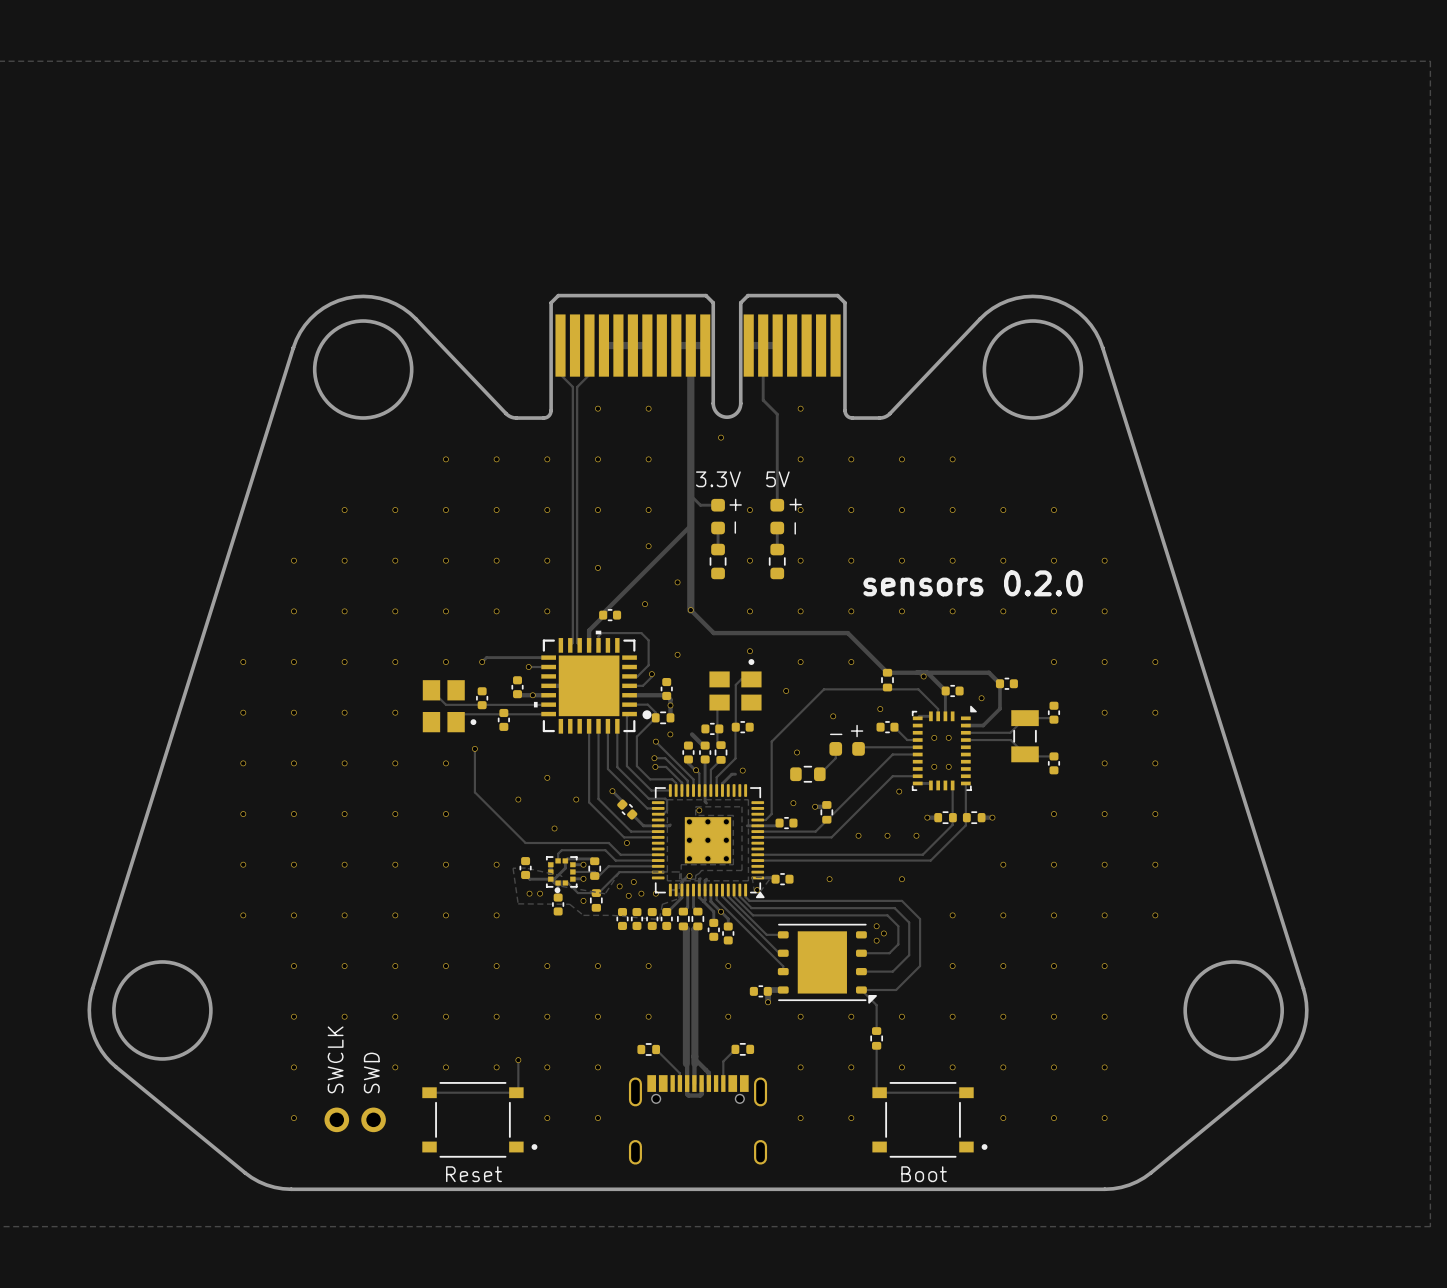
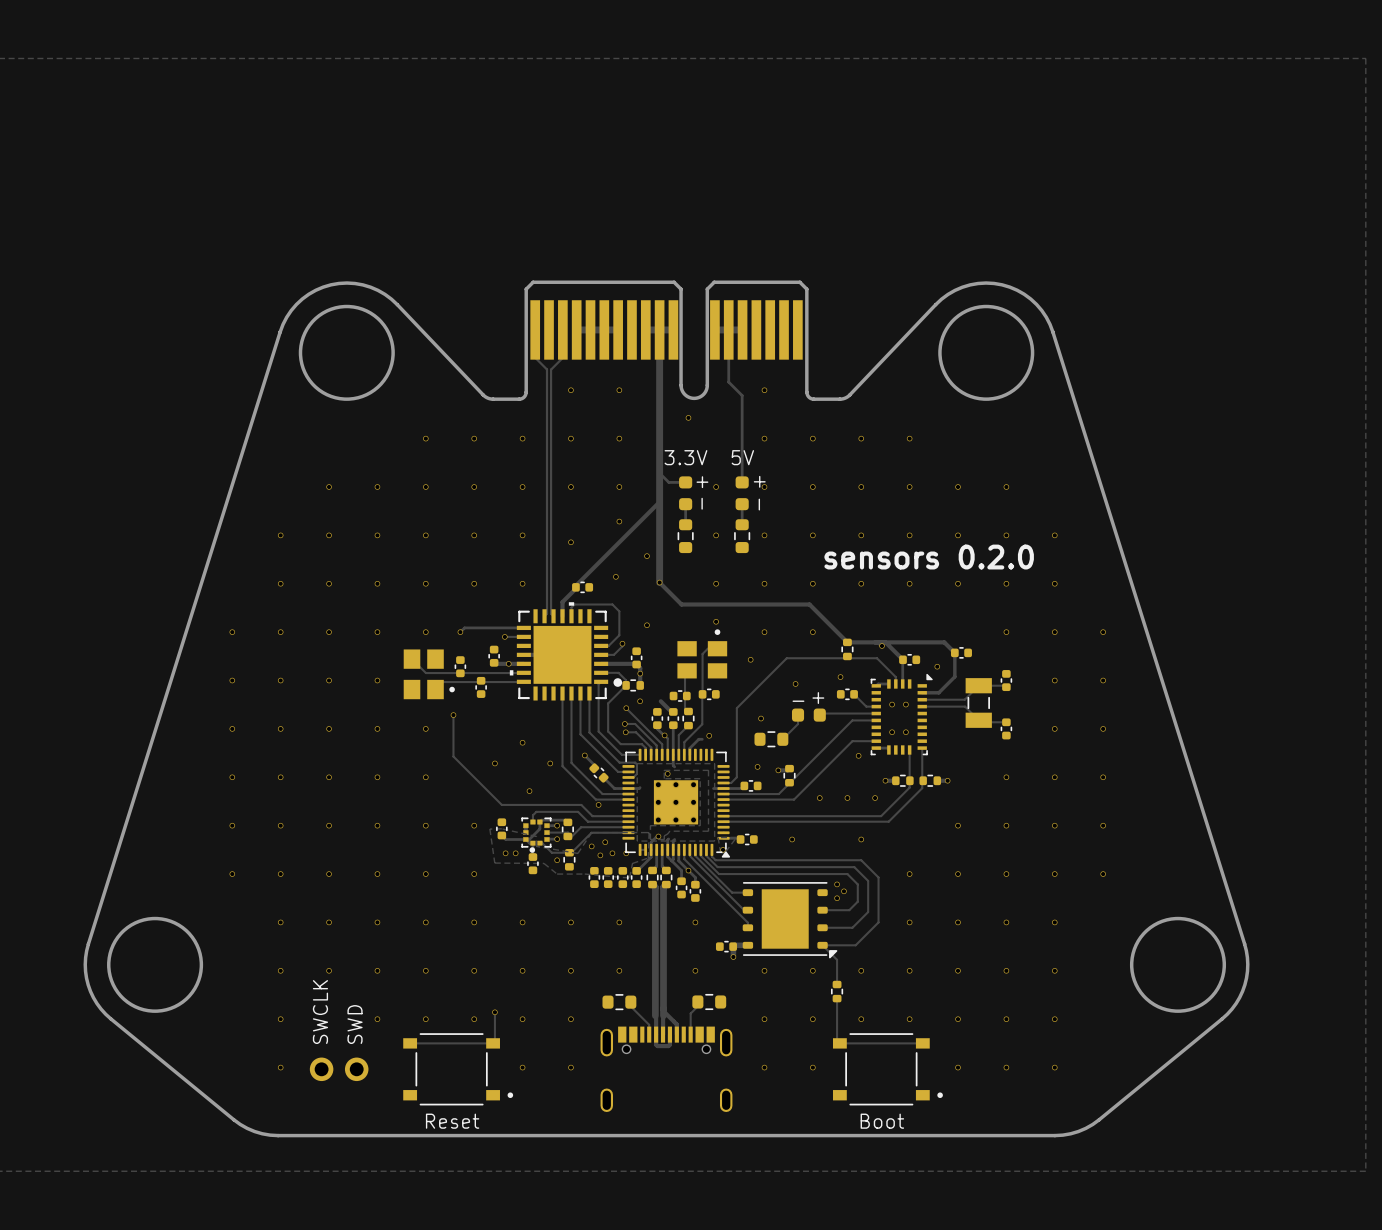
part footprint: [731, 1042, 755, 1056] -> [692, 993, 727, 1011]
part footprint: [637, 1043, 661, 1056] -> [602, 994, 637, 1011]

